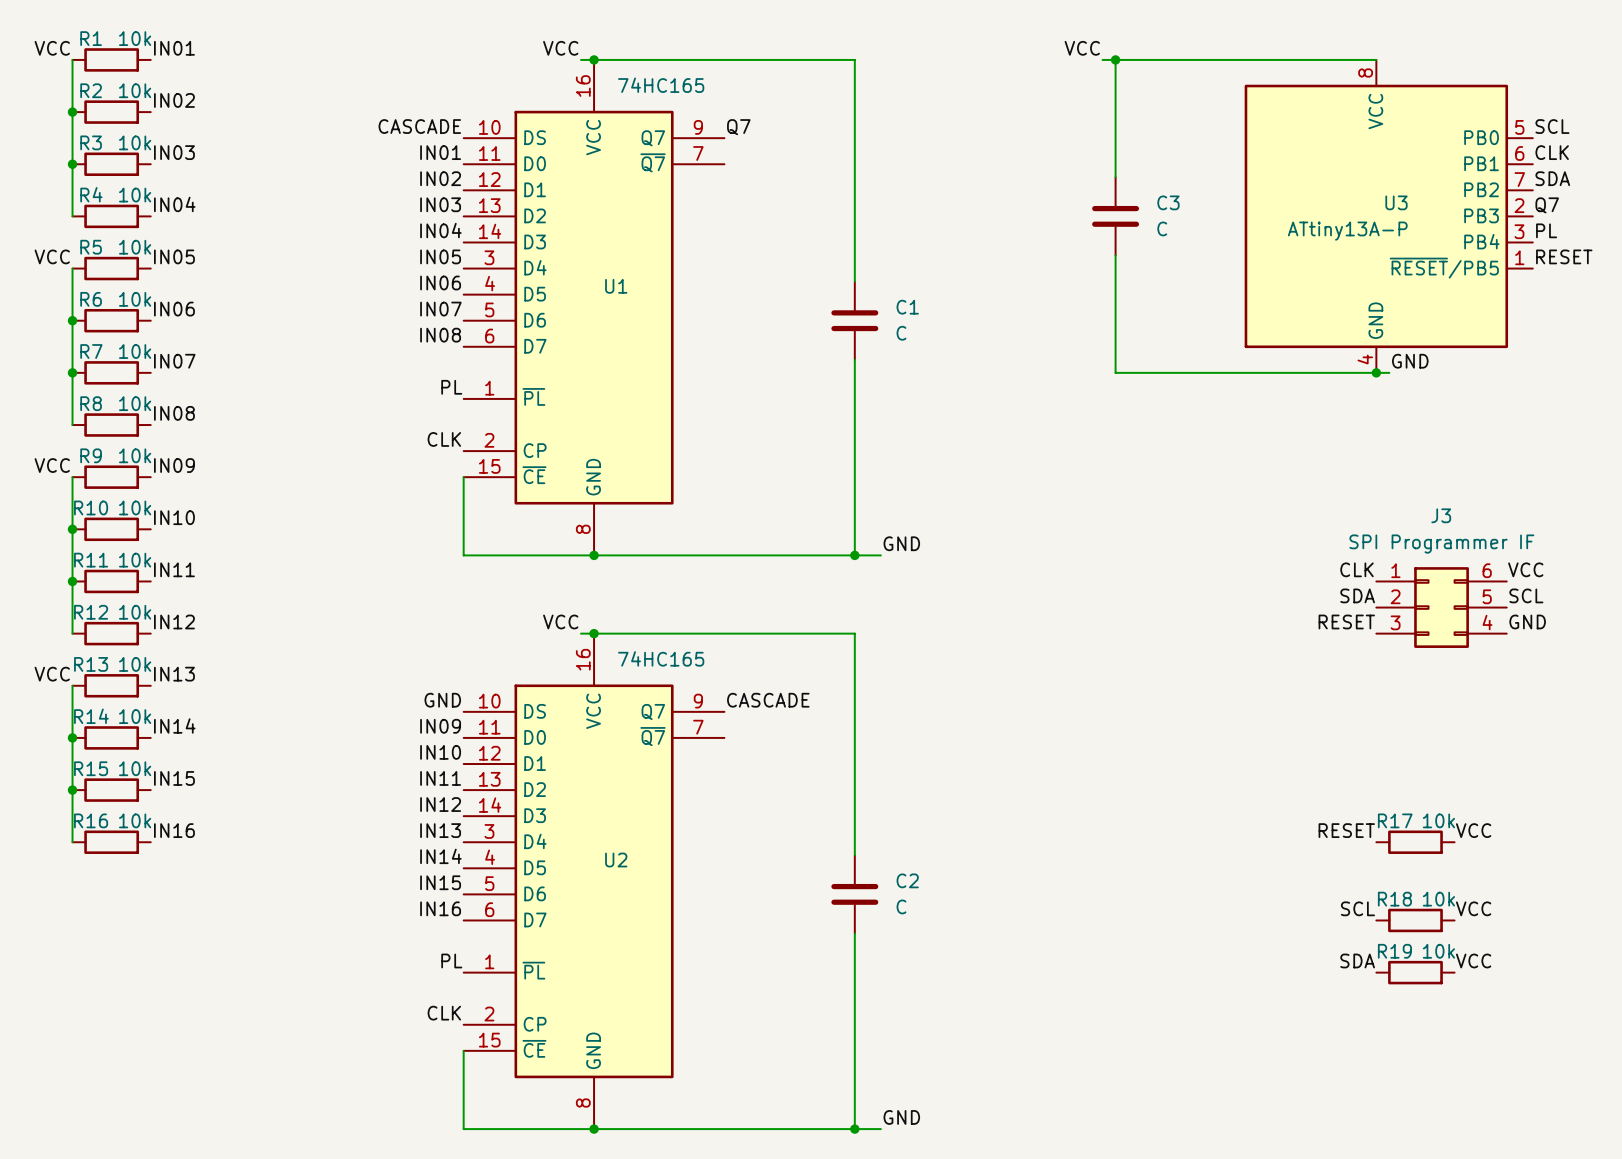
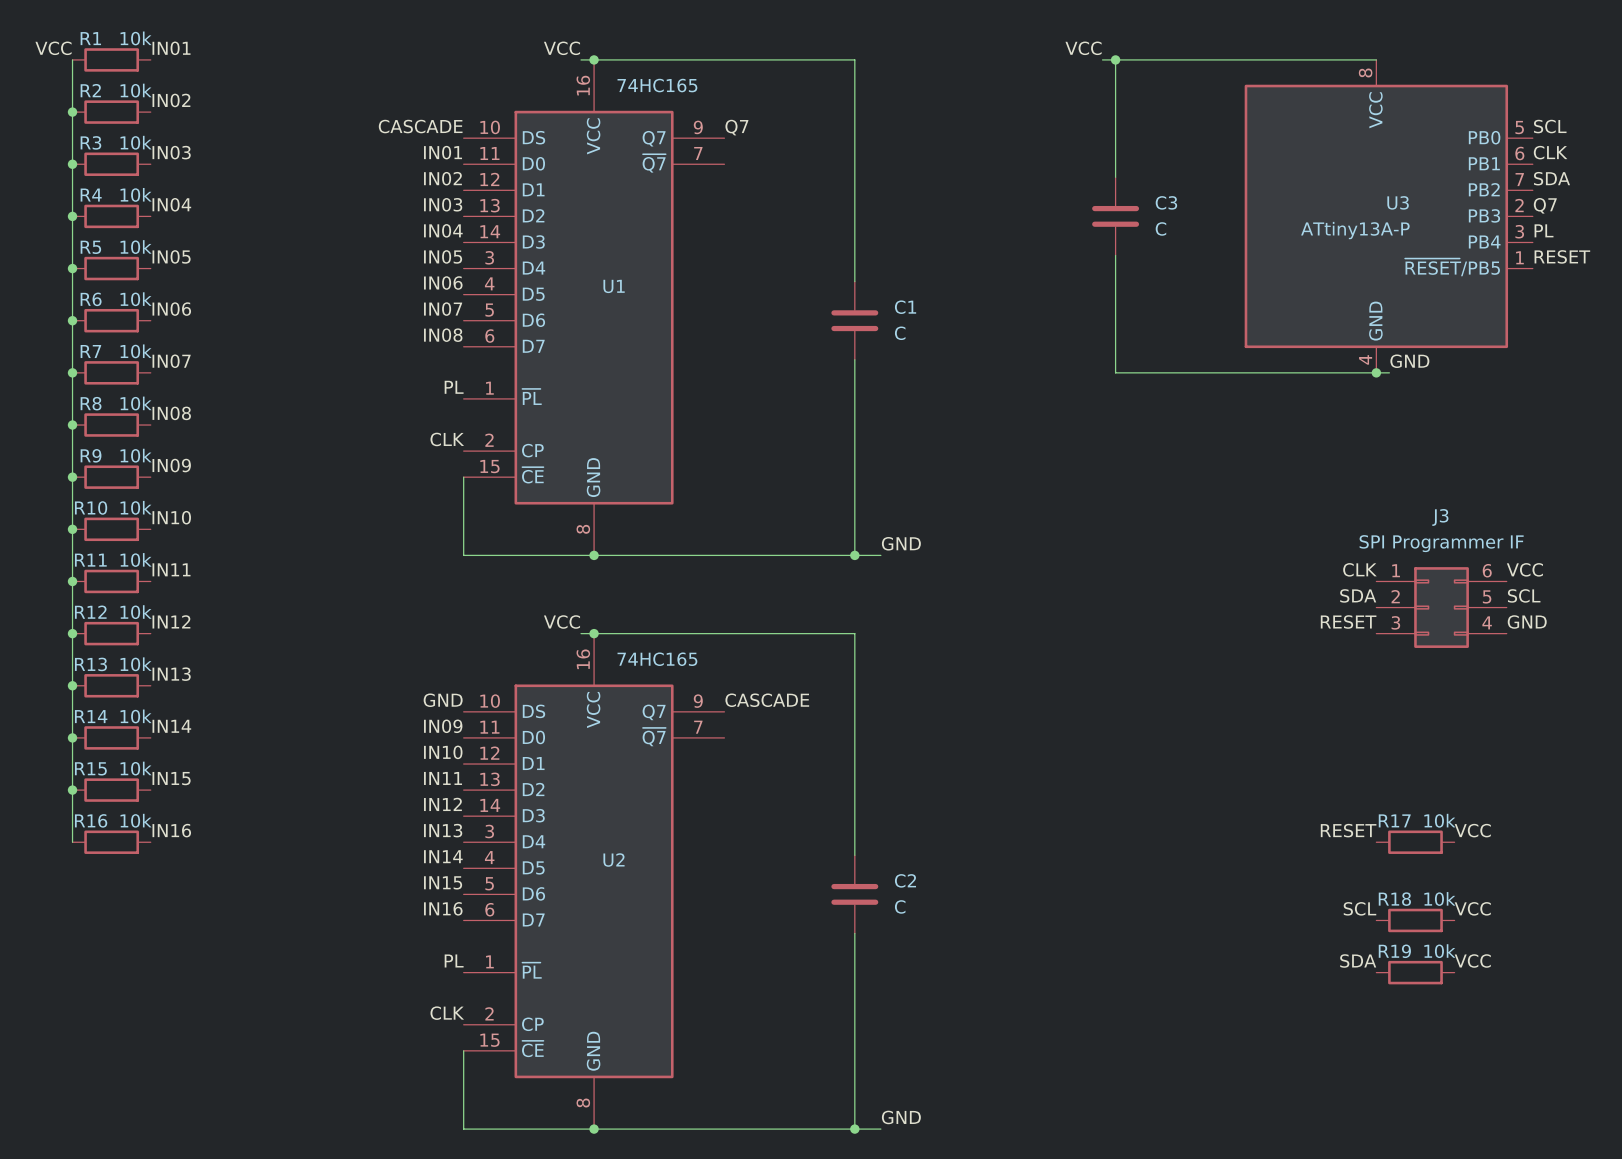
wire: none -> (72, 216) (72, 268)
junction: none -> (72, 216)
label: VCC (52, 256) -> none
junction: none -> (72, 268)
wire: none -> (72, 425) (72, 477)
junction: none -> (72, 425)
label: VCC (52, 465) -> none
junction: none -> (72, 477)
wire: none -> (72, 633) (72, 685)
junction: none -> (72, 633)
label: VCC (52, 674) -> none
junction: none -> (72, 685)

